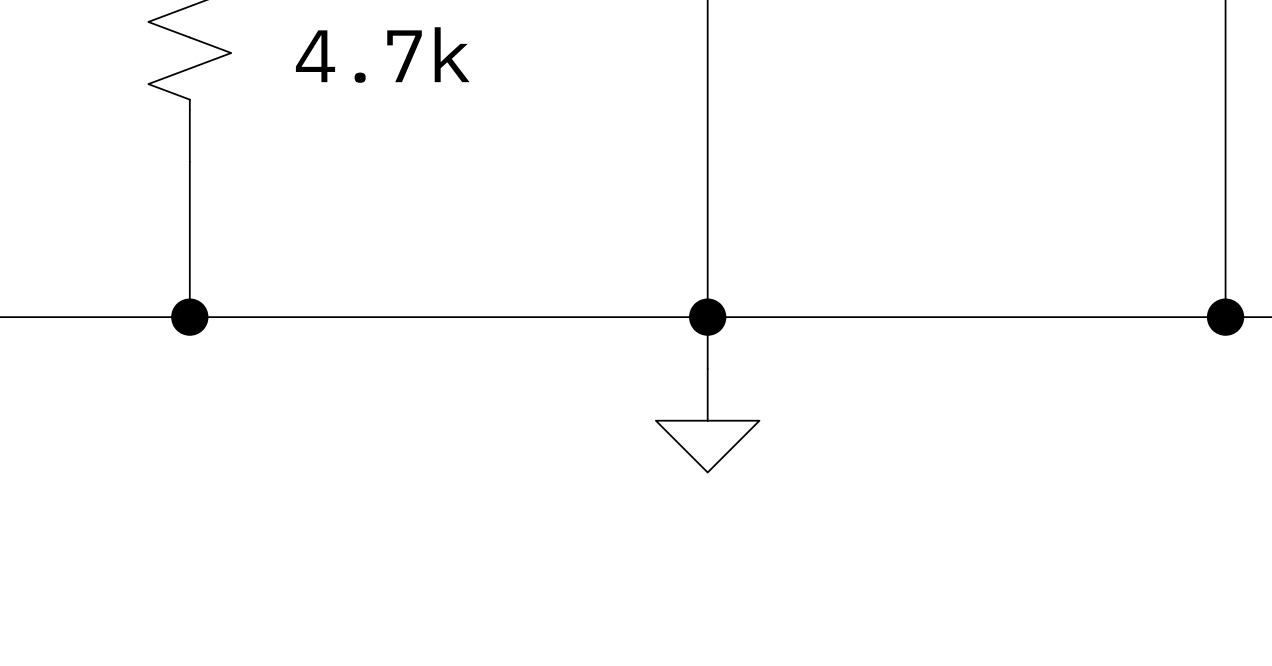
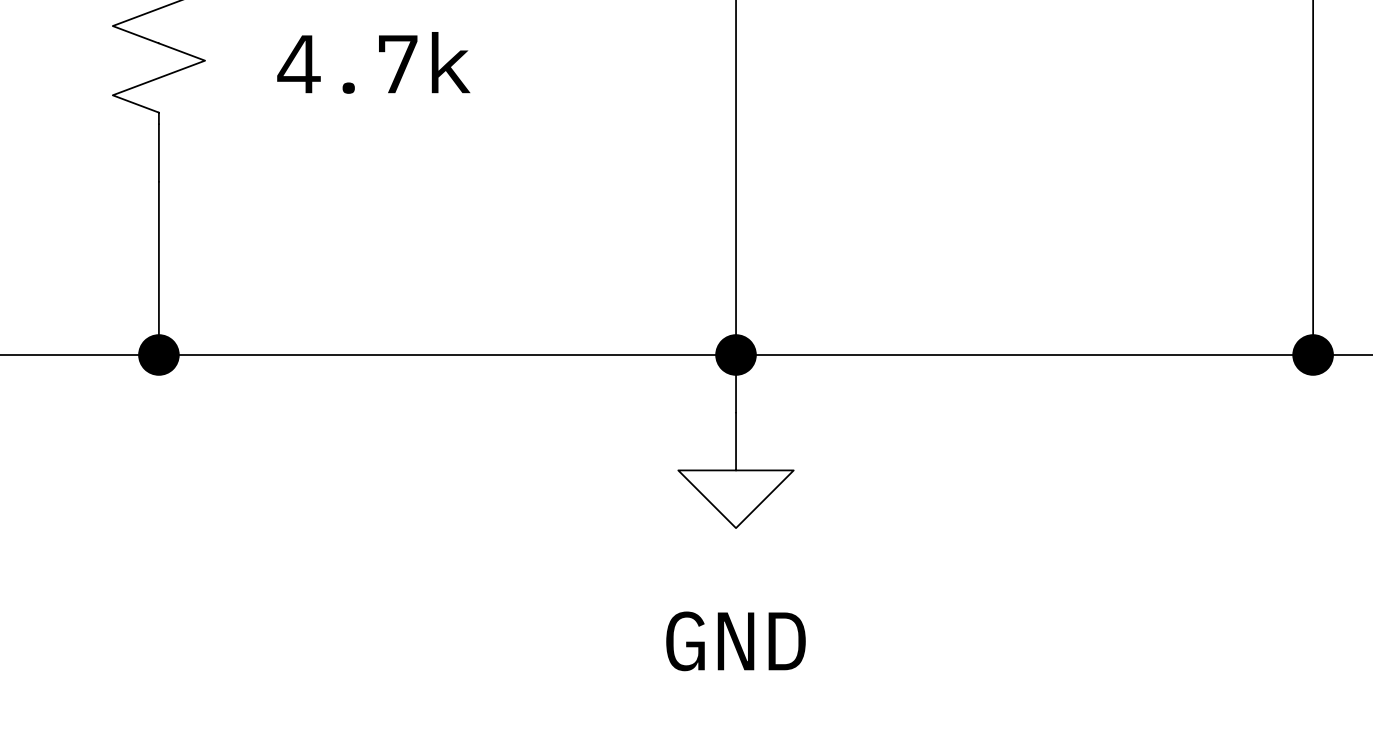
power symbol text: none -> GND (736, 641)

